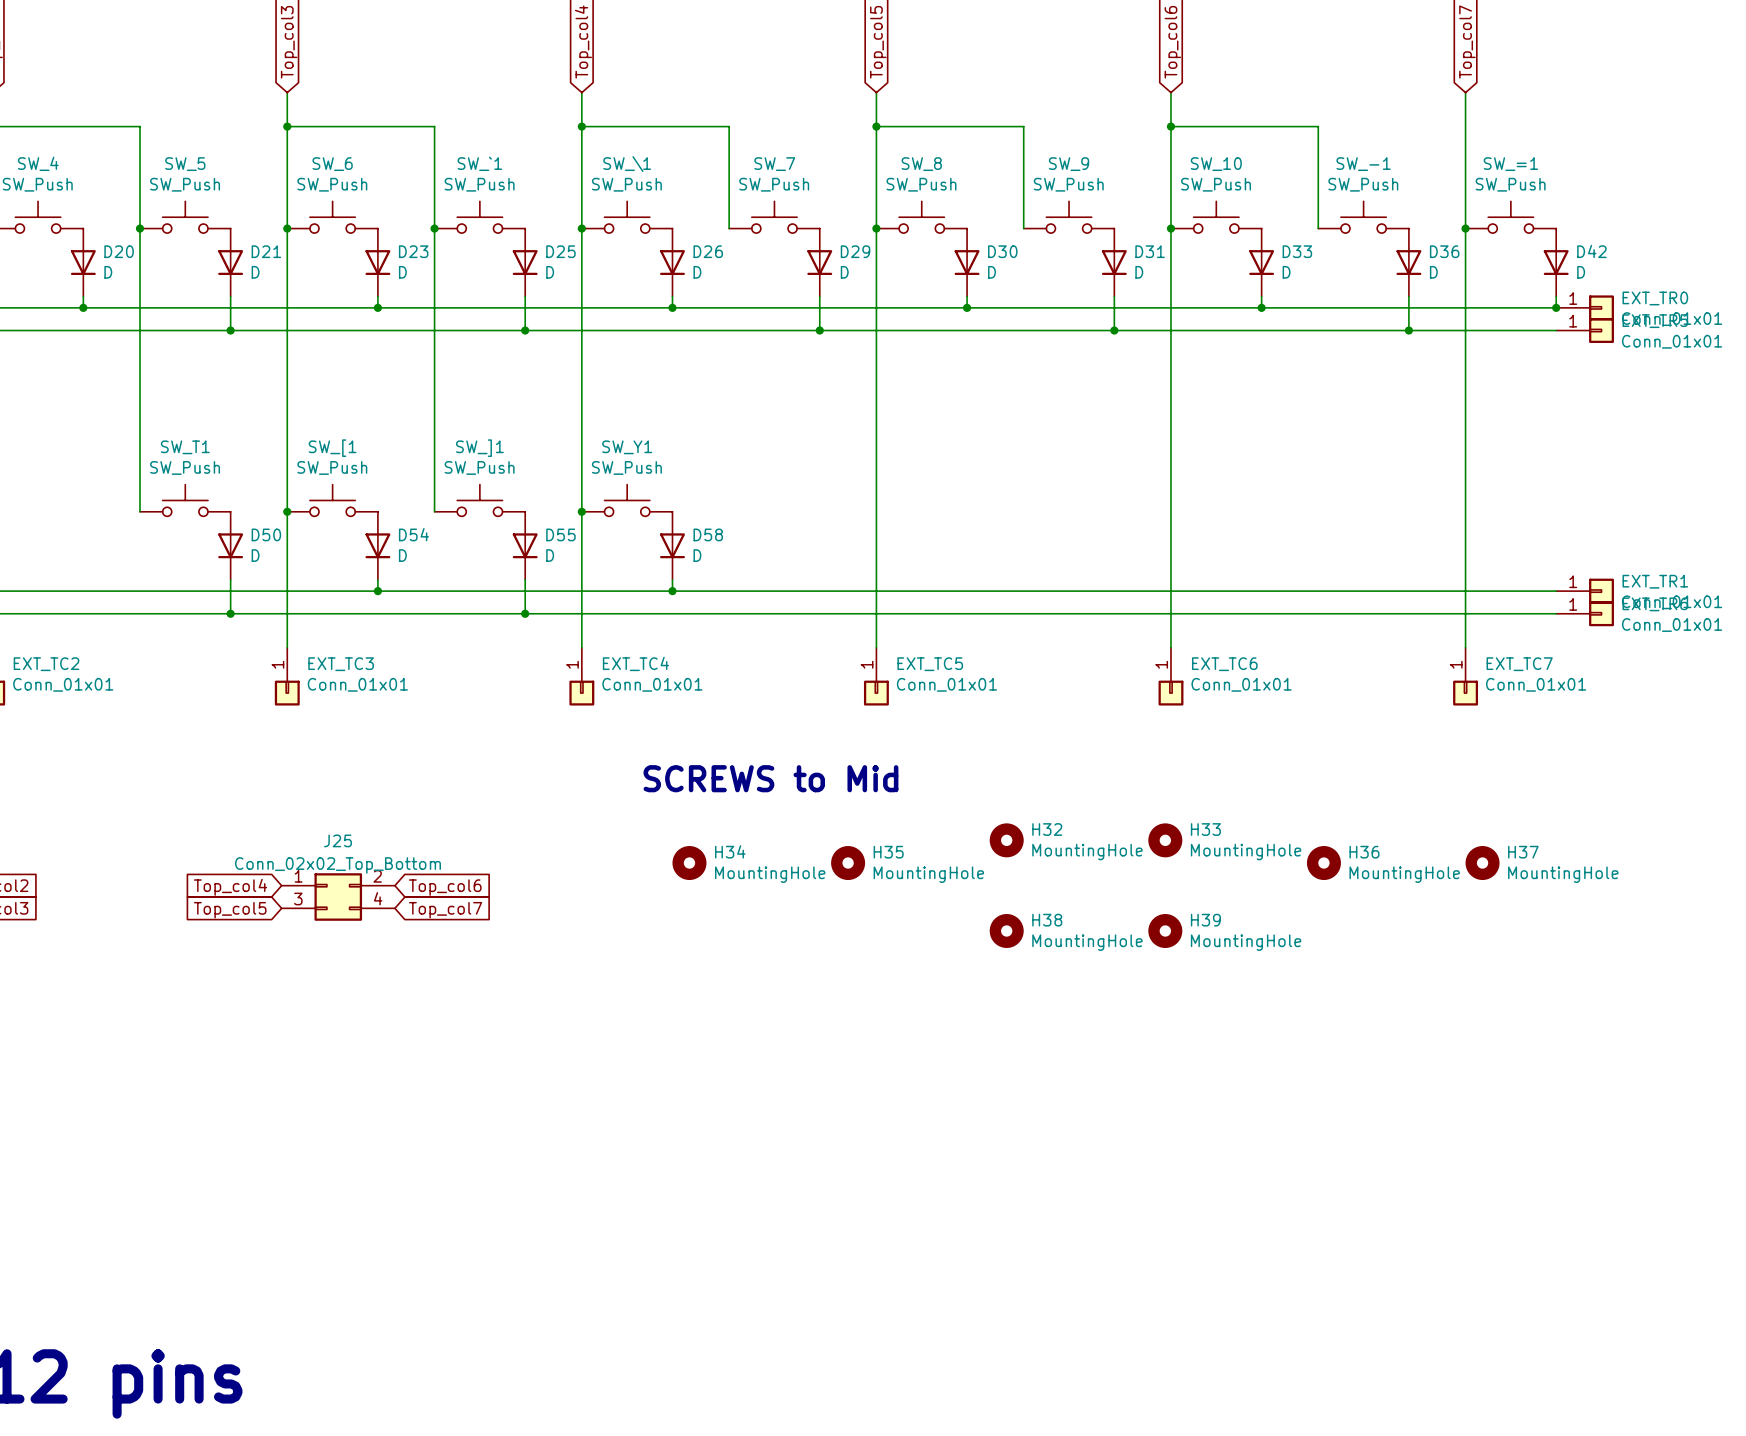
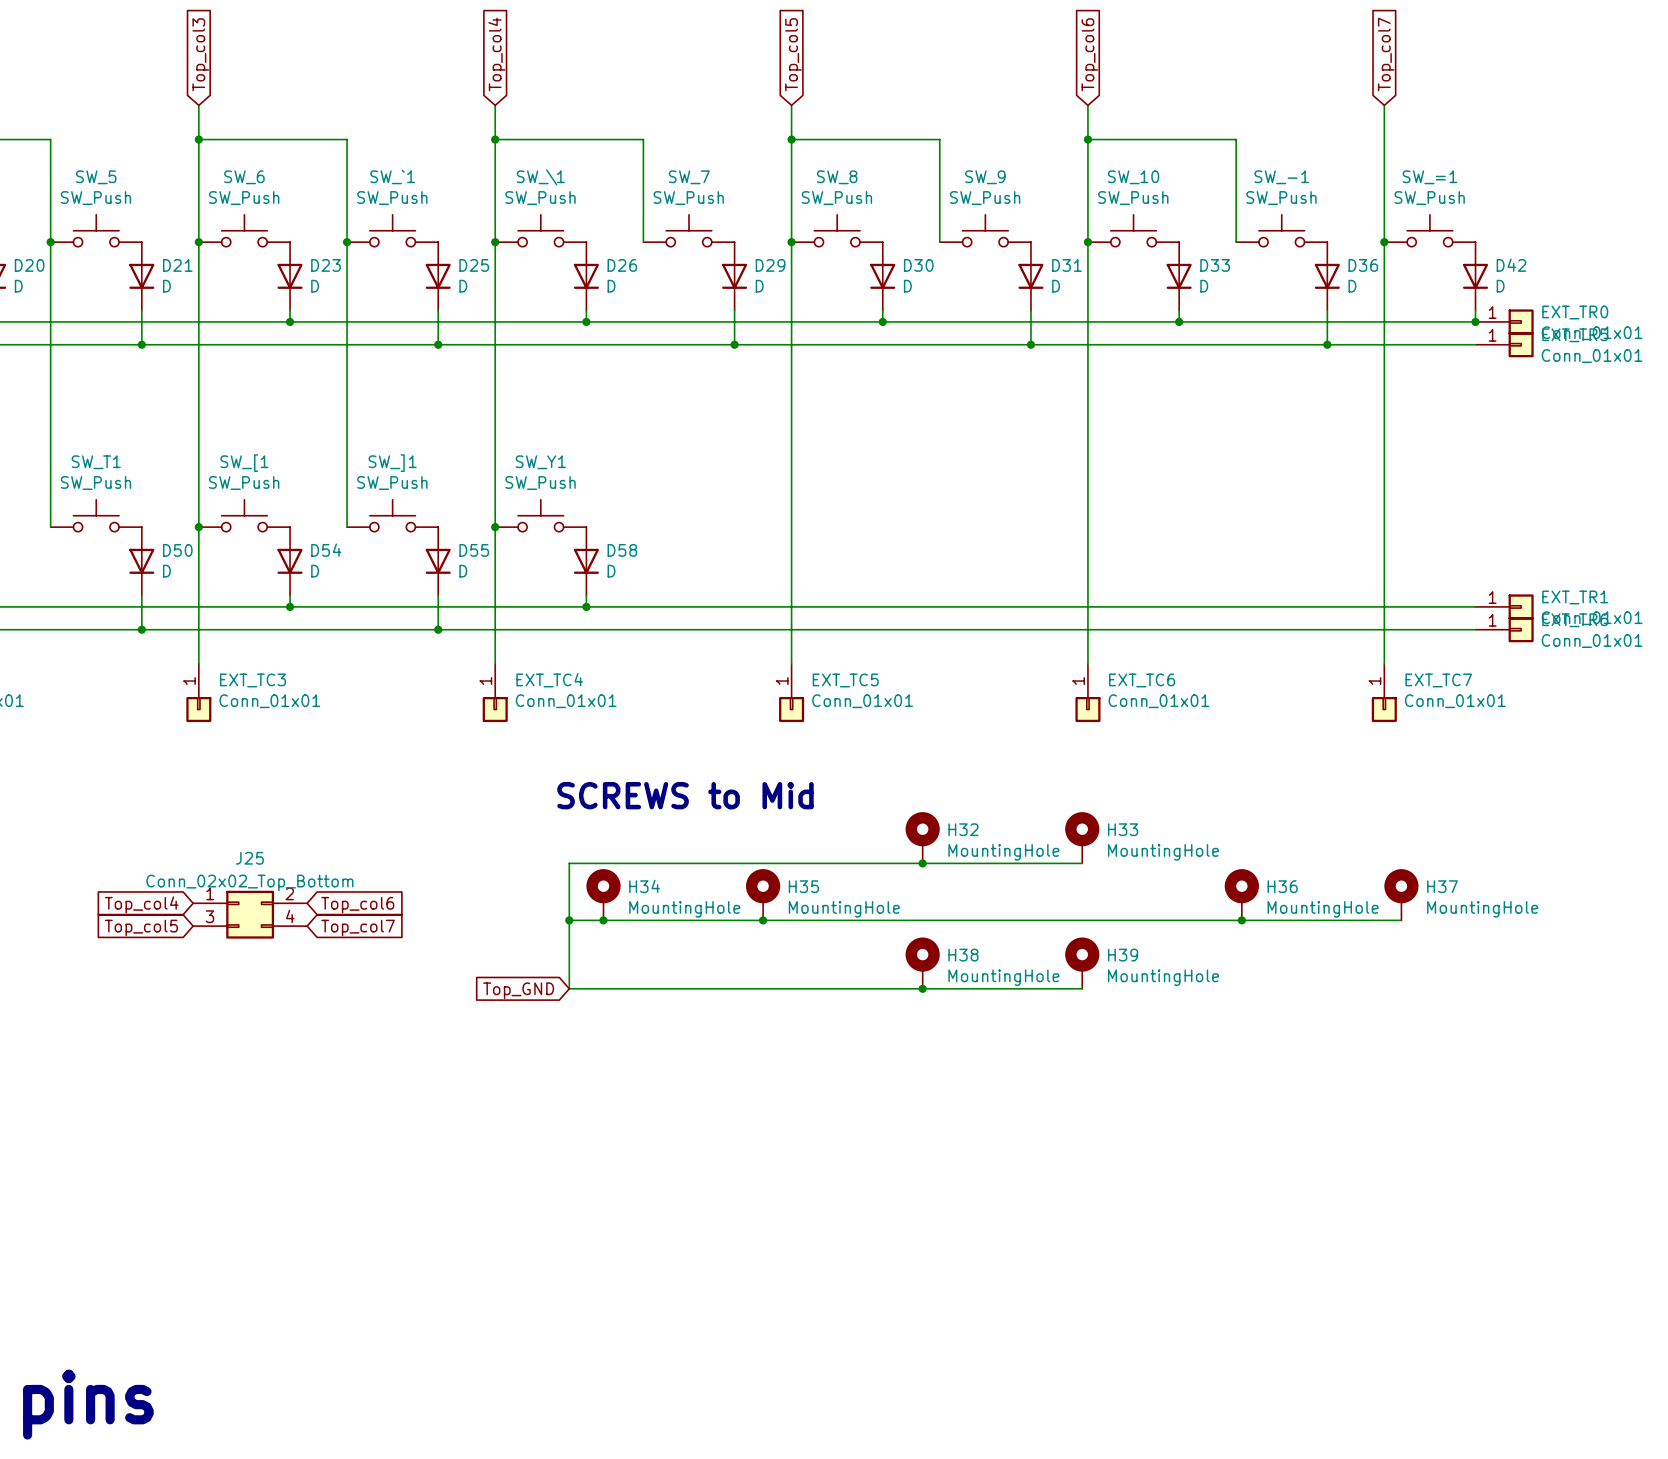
H32 symbol: [989, 823, 1024, 858] -> [905, 812, 940, 864]
H33 symbol: [1148, 823, 1183, 858] -> [1065, 812, 1100, 864]
H34 symbol: [672, 846, 707, 881] -> [586, 869, 621, 921]
H35 symbol: [831, 846, 866, 881] -> [745, 869, 781, 921]
junction: none -> (922, 863)
wire: none -> (1082, 863) (569, 863) (569, 988) (1082, 988)
H36 symbol: [1306, 846, 1341, 881] -> [1224, 869, 1259, 921]
H37 symbol: [1465, 846, 1500, 881] -> [1384, 869, 1419, 921]
wire: none -> (569, 920) (1401, 920)
junction: none -> (569, 920)
junction: none -> (603, 920)
junction: none -> (763, 920)
junction: none -> (1241, 920)
H38 symbol: [989, 914, 1024, 948] -> [905, 937, 940, 989]
H39 symbol: [1148, 914, 1183, 948] -> [1065, 937, 1100, 989]
junction: none -> (922, 988)
global label: none -> Top_GND (518, 990)

